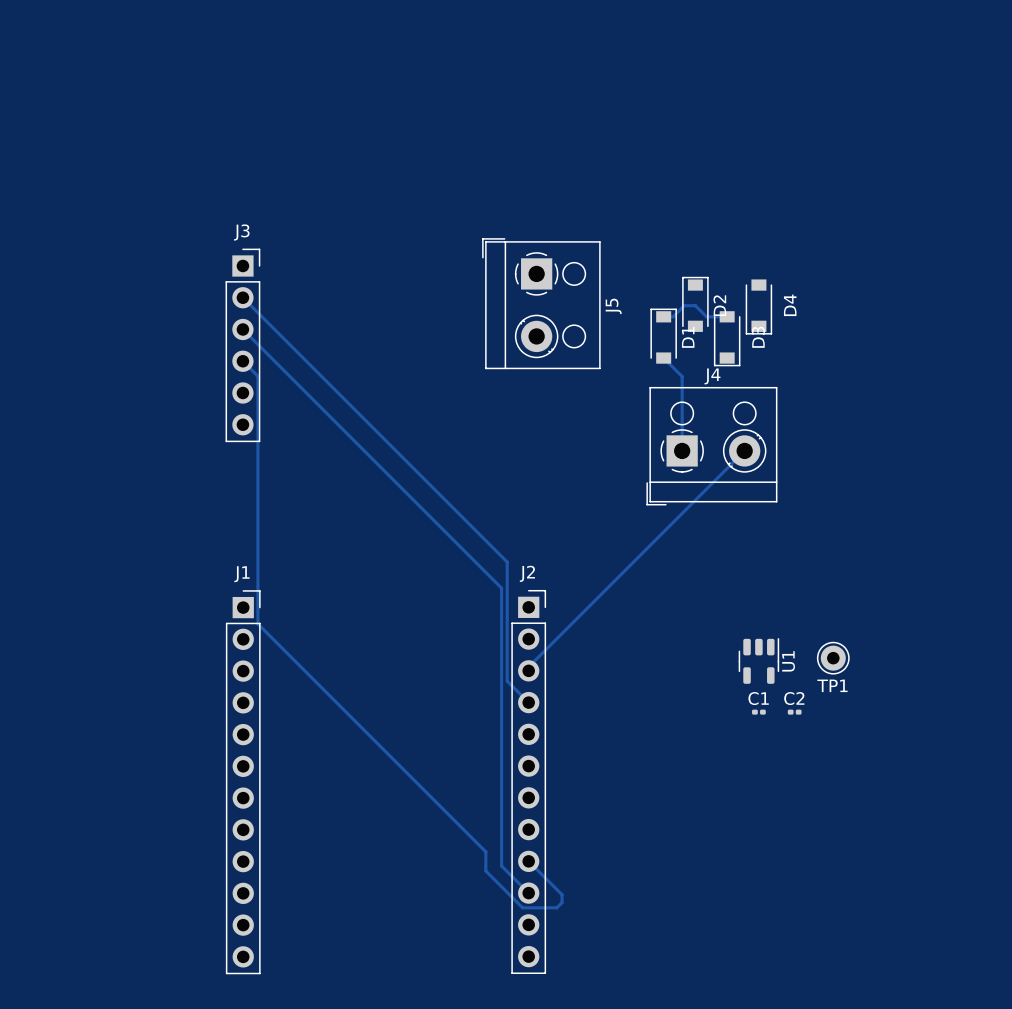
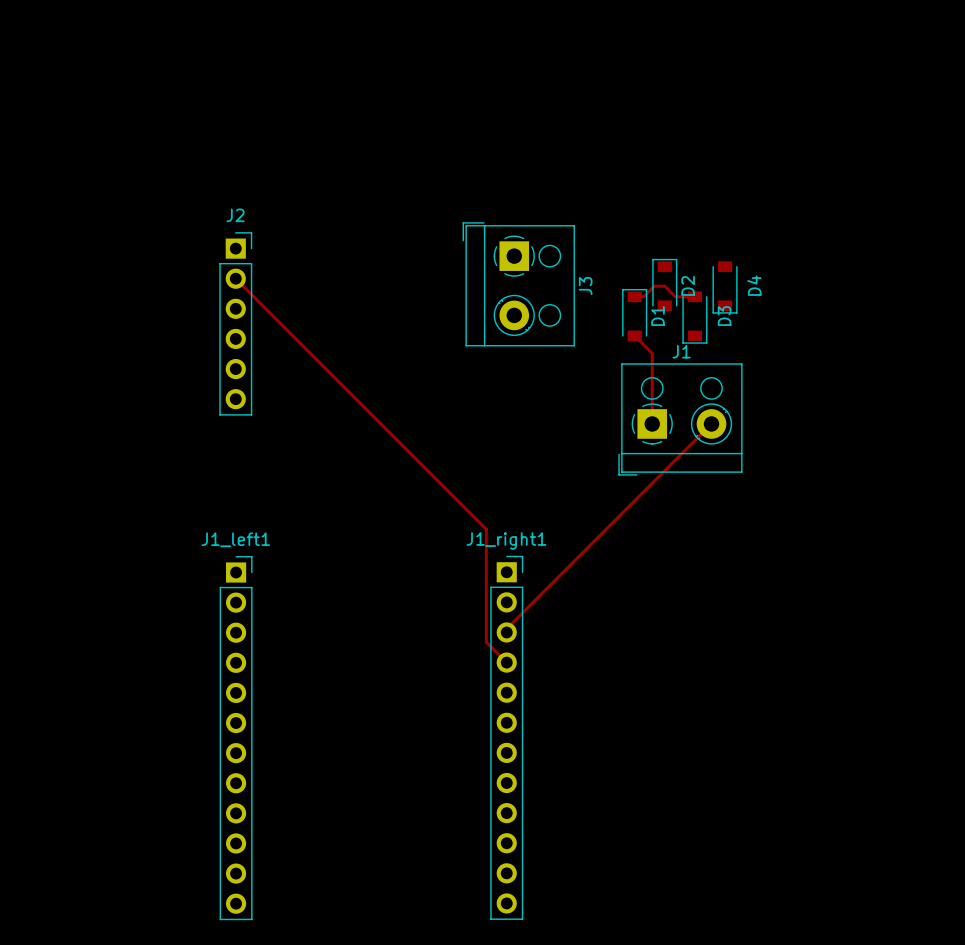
J3 name: J3 (241, 232) -> J2 (235, 215)
J5 name: J5 (613, 306) -> J3 (585, 286)
track: (242, 329) (501, 588) (501, 865) (528, 893) -> none
track: (242, 361) (257, 376) (257, 623) (485, 851) (485, 871) (522, 907) (556, 907) (562, 902) (562, 894) (528, 861) -> none
J4 name: J4 (712, 376) -> J1 (681, 351)
J2 name: J2 (527, 573) -> J1_right1 (506, 540)
J1 name: J1 (242, 574) -> J1_left1 (235, 539)
TP1: (833, 658) -> none
U1: (758, 660) -> none
C1: (758, 712) -> none
C2: (794, 712) -> none

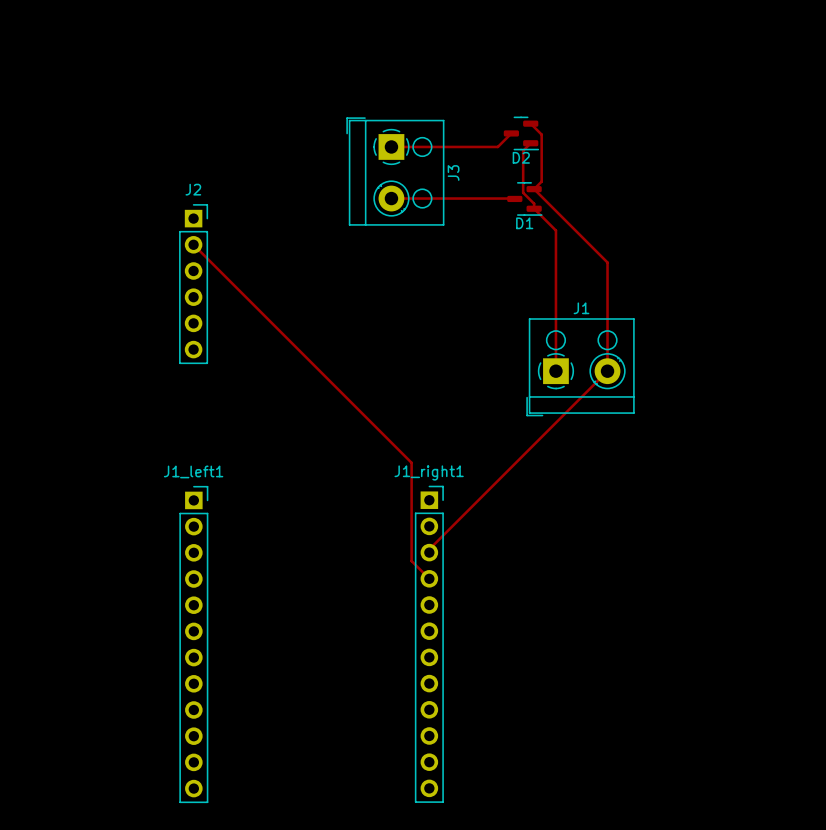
track: none -> (530, 123) (541, 134) (541, 181) (534, 189) (607, 262) (607, 371)
track: none -> (511, 133) (497, 146) (391, 146)
track: none -> (391, 198) (514, 198)
D2 footprint: [652, 258, 678, 312] -> [503, 116, 539, 151]
J3 position: (518, 284) -> (395, 171)
D2 name position: D2 (688, 285) -> D2 (521, 157)
D4: (725, 287) -> none
D1 footprint: [622, 288, 648, 342] -> [507, 182, 543, 216]
track: (634, 296) (643, 296) (654, 286) (664, 286) (675, 296) (694, 296) -> none
D1 name position: D1 (657, 316) -> D1 (524, 223)
D3: (694, 317) -> none
track: (634, 335) (652, 353) -> (530, 143) (523, 150) (523, 192) (534, 203) (534, 208) (555, 230) (555, 309)

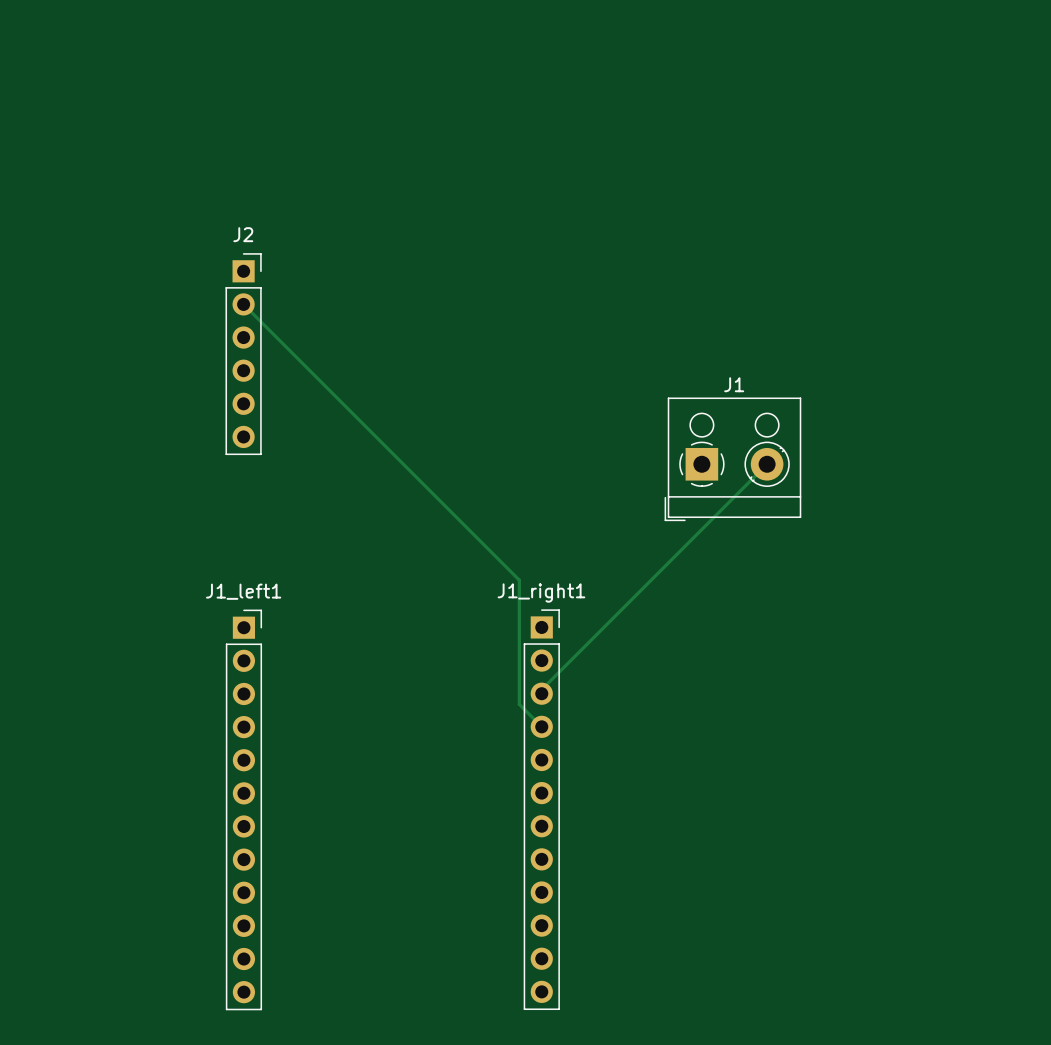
track: (530, 123) (541, 134) (541, 181) (534, 189) (607, 262) (607, 371) -> none
track: (511, 133) (497, 146) (391, 146) -> none
D2: (521, 133) -> none
track: (530, 143) (523, 150) (523, 192) (534, 203) (534, 208) (555, 230) (555, 371) -> none
J3: (395, 171) -> none
track: (391, 198) (514, 198) -> none
D1: (524, 198) -> none

